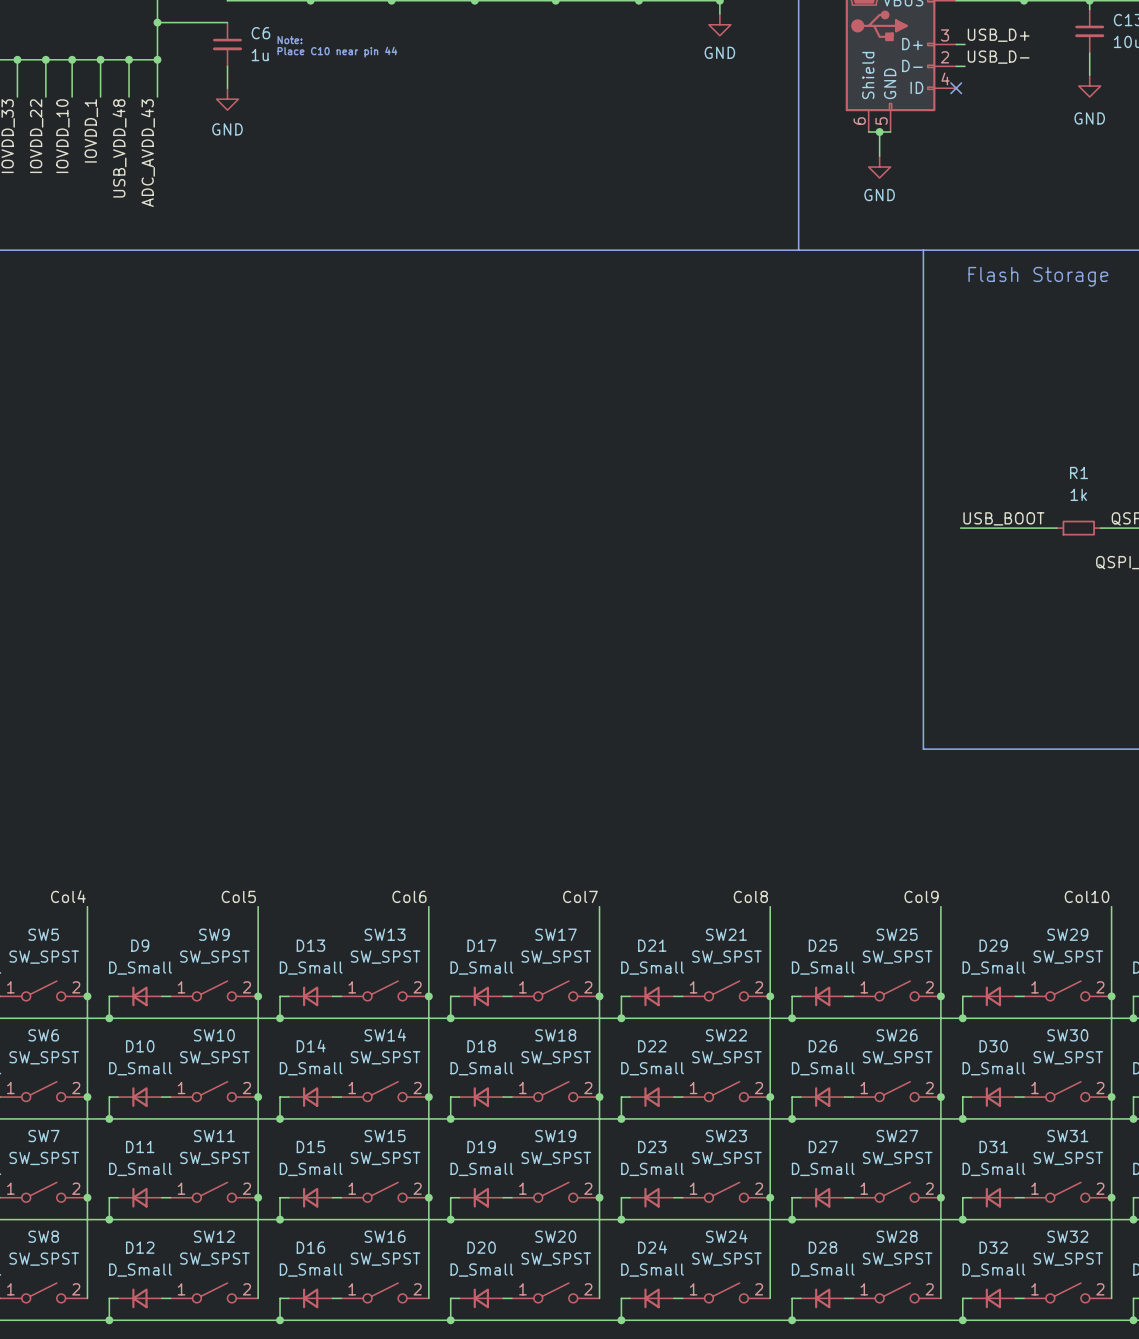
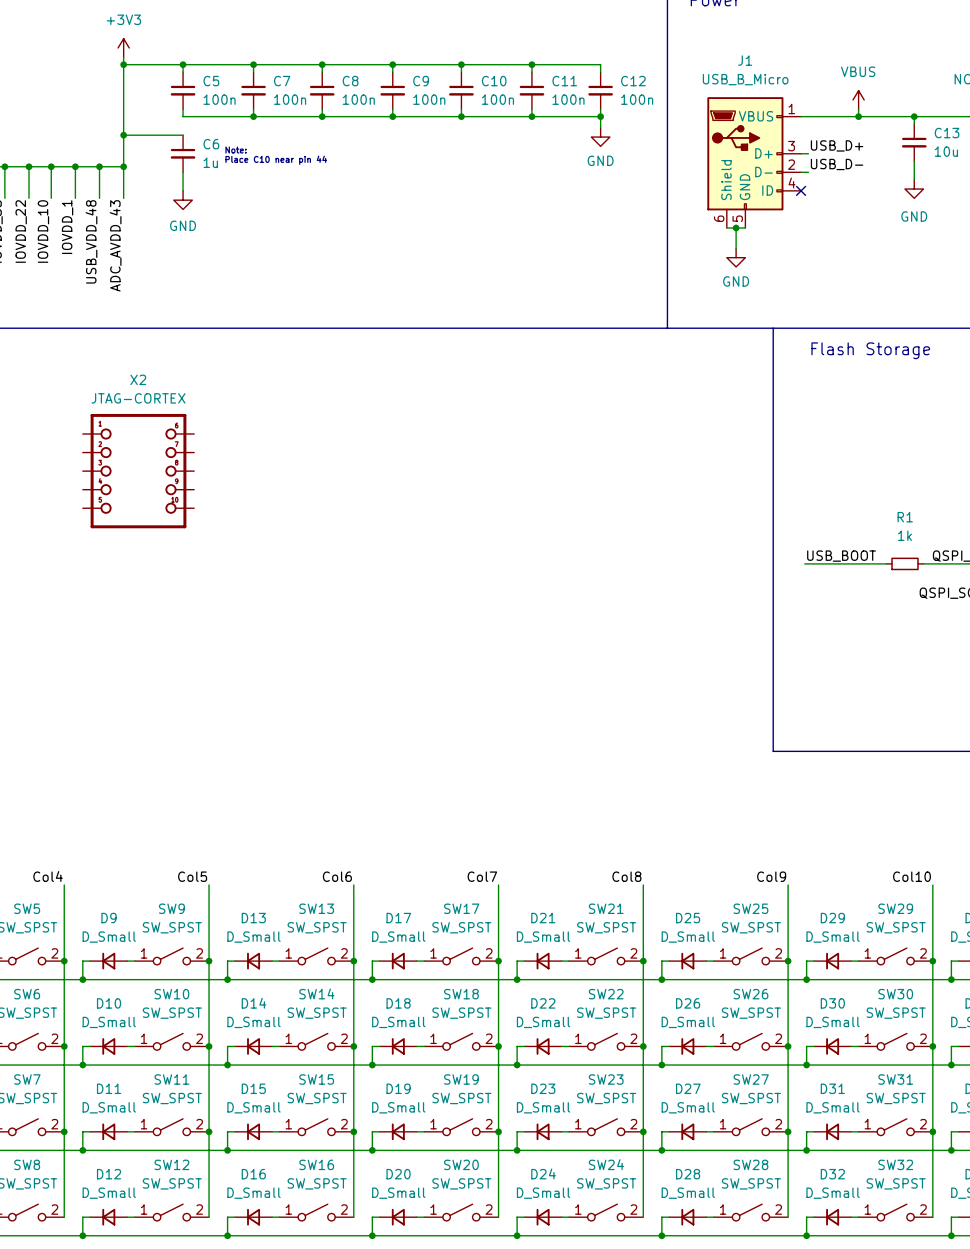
X2: none -> JTAG-CORTEX (138, 471)

